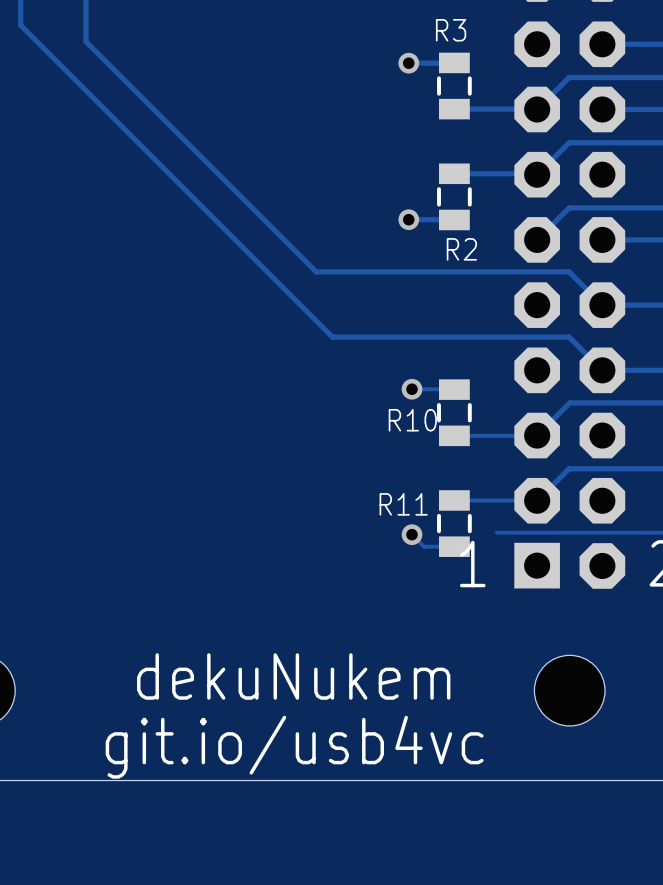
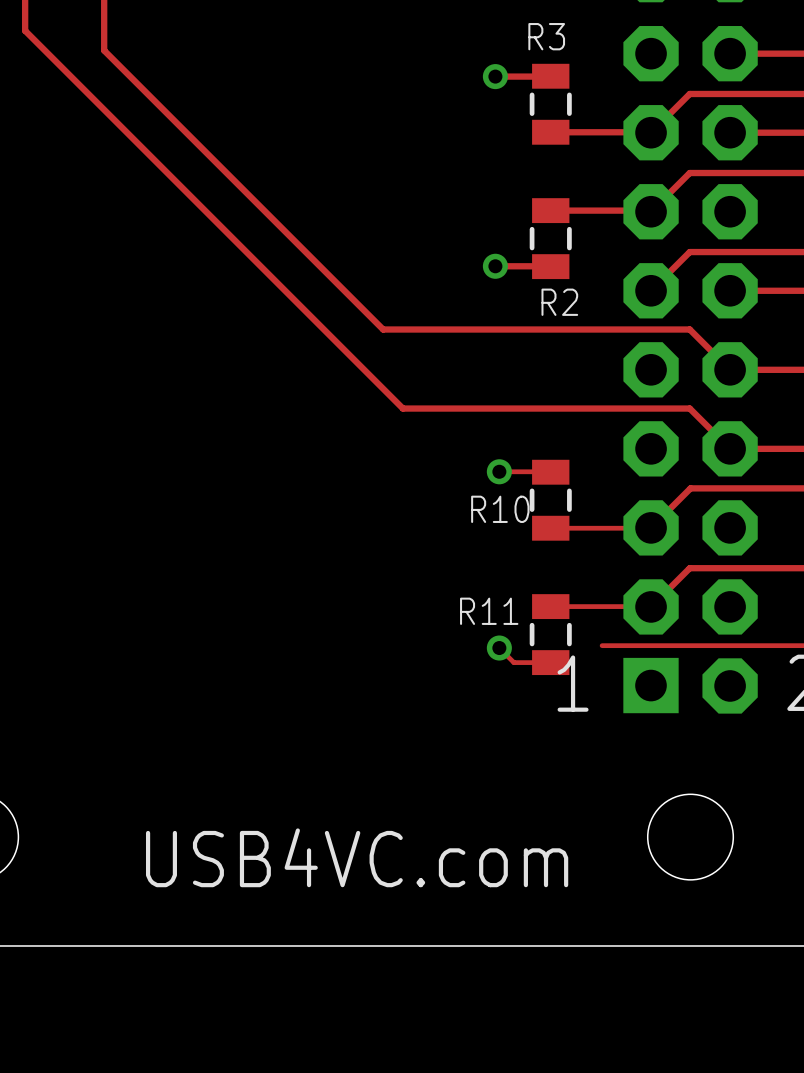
text: dekuNukem (293, 676) -> none
text: none -> USB4VC.com (357, 857)
text: git.io/usb4vc (294, 747) -> none

